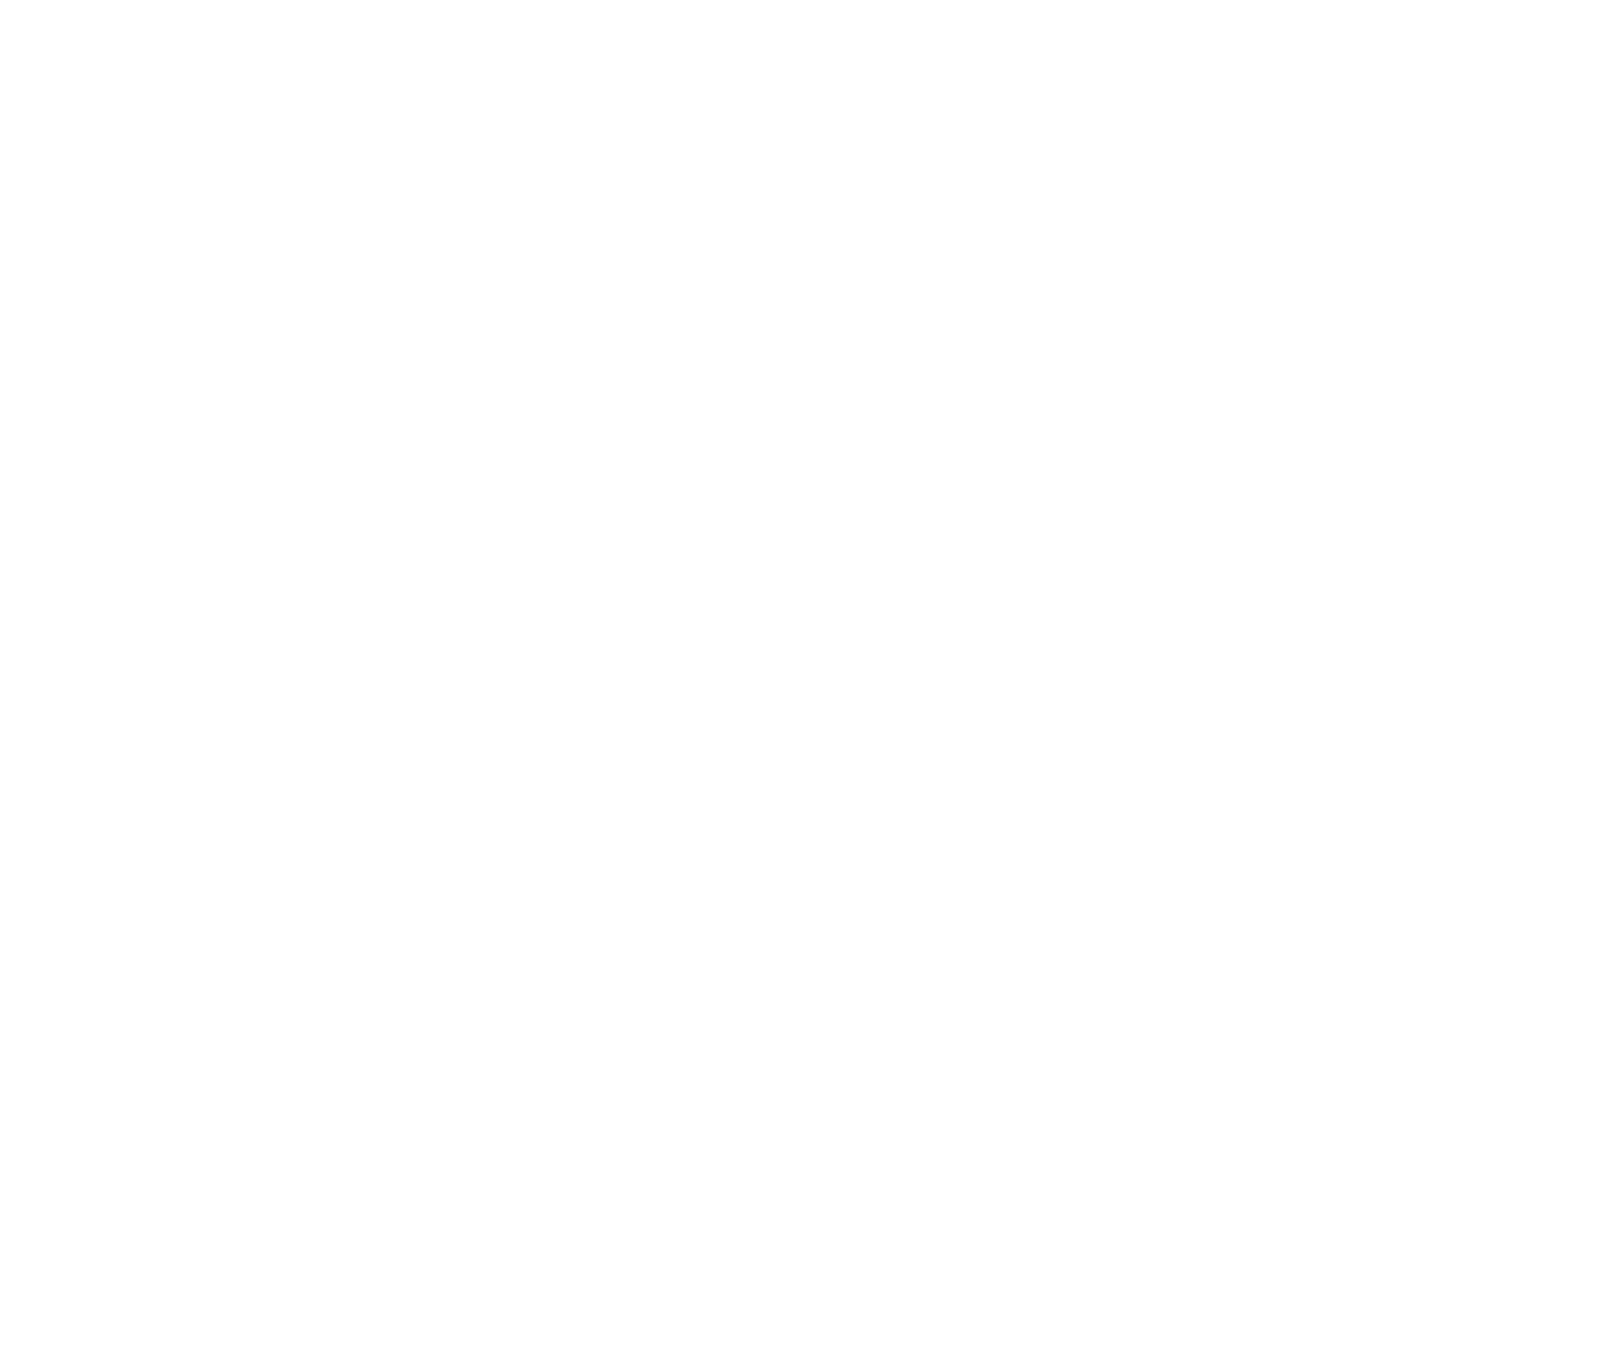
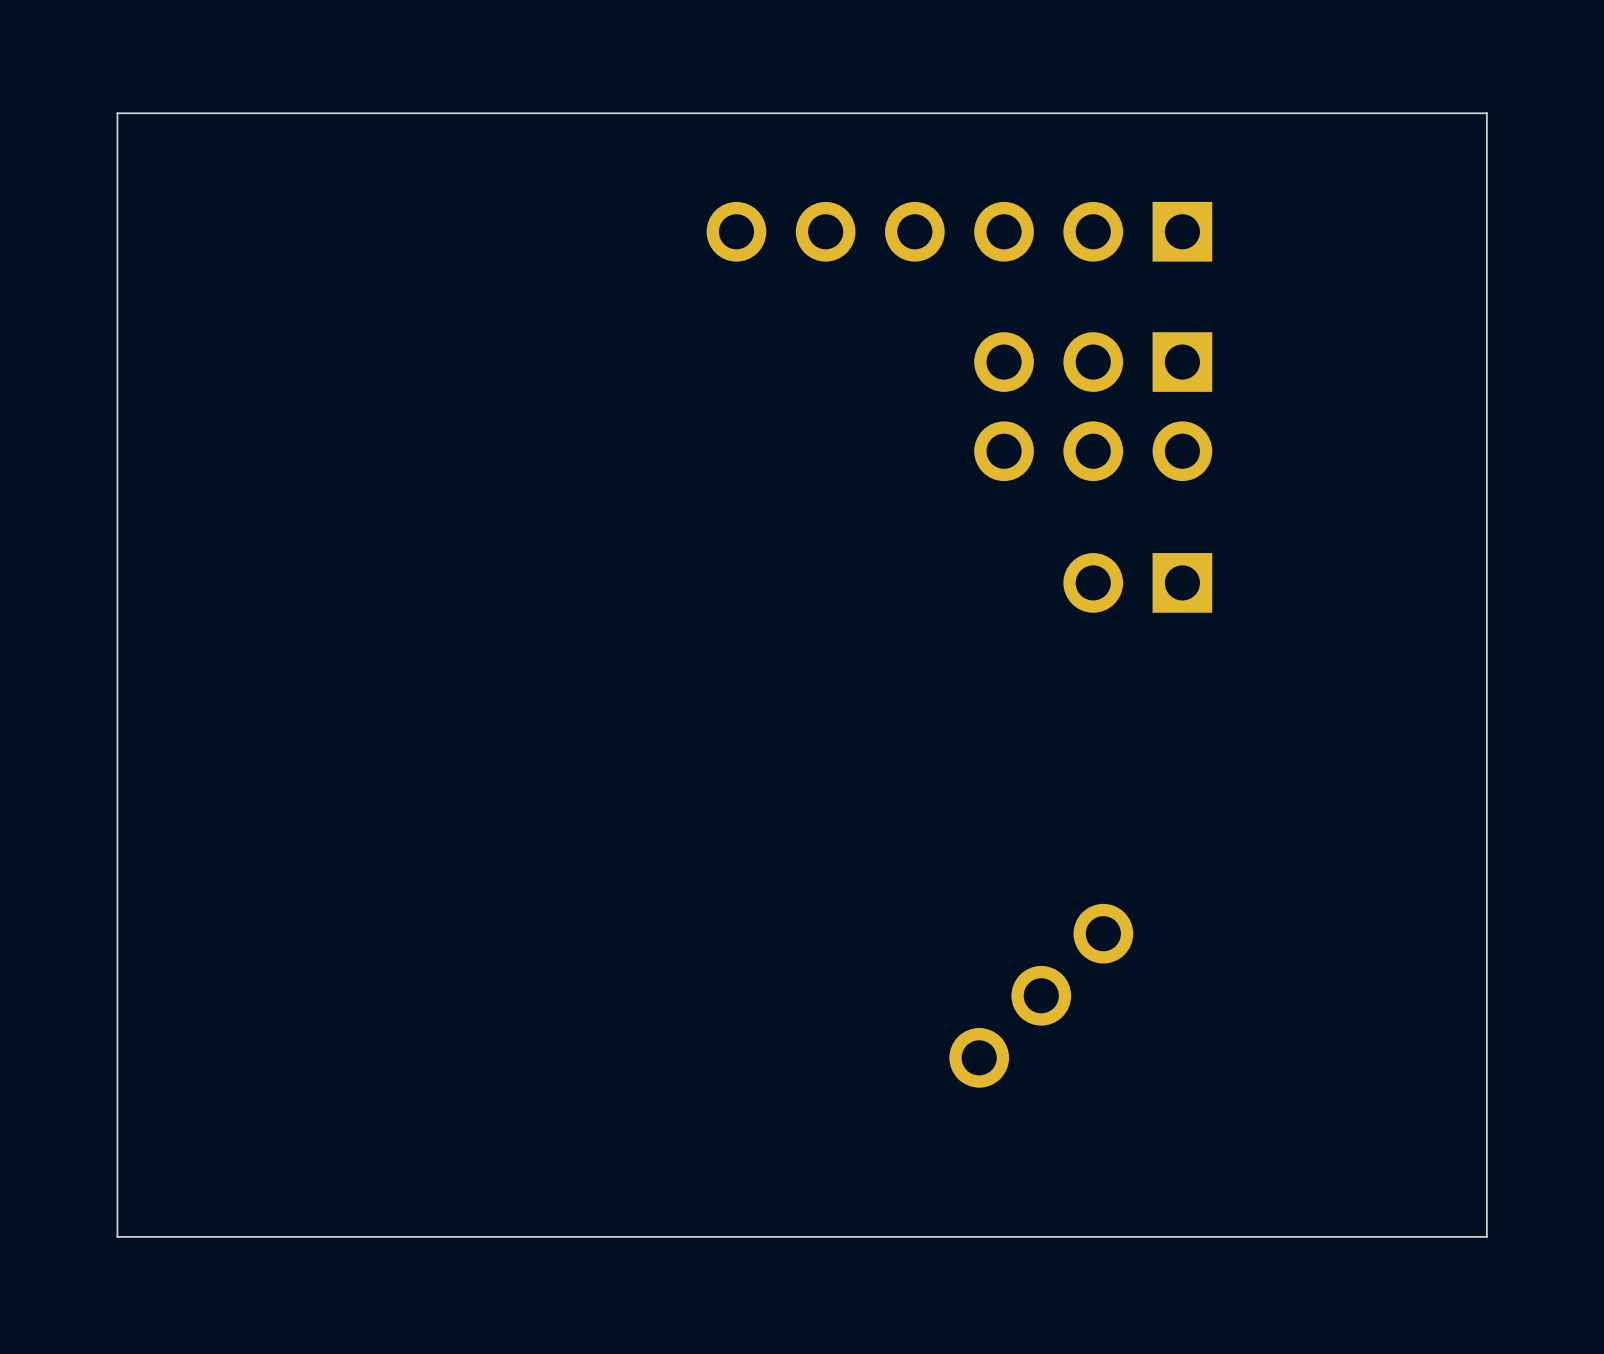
board edge: none -> (1486, 113) (117, 113) (117, 1236) (1486, 1236) (1486, 113)
part: none -> (959, 231)
part: none -> (1093, 406)
part: none -> (1137, 582)
part: none -> (1041, 995)

